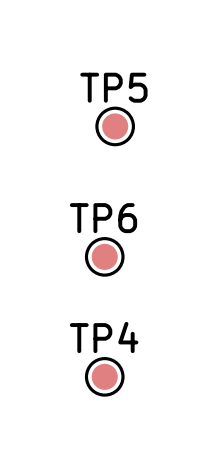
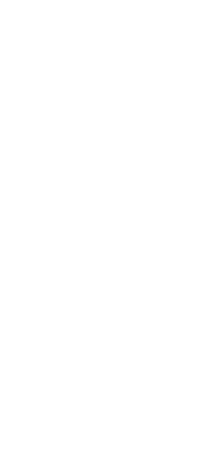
TP5: (115, 126) -> none
TP6: (104, 256) -> none
TP4: (104, 376) -> none

